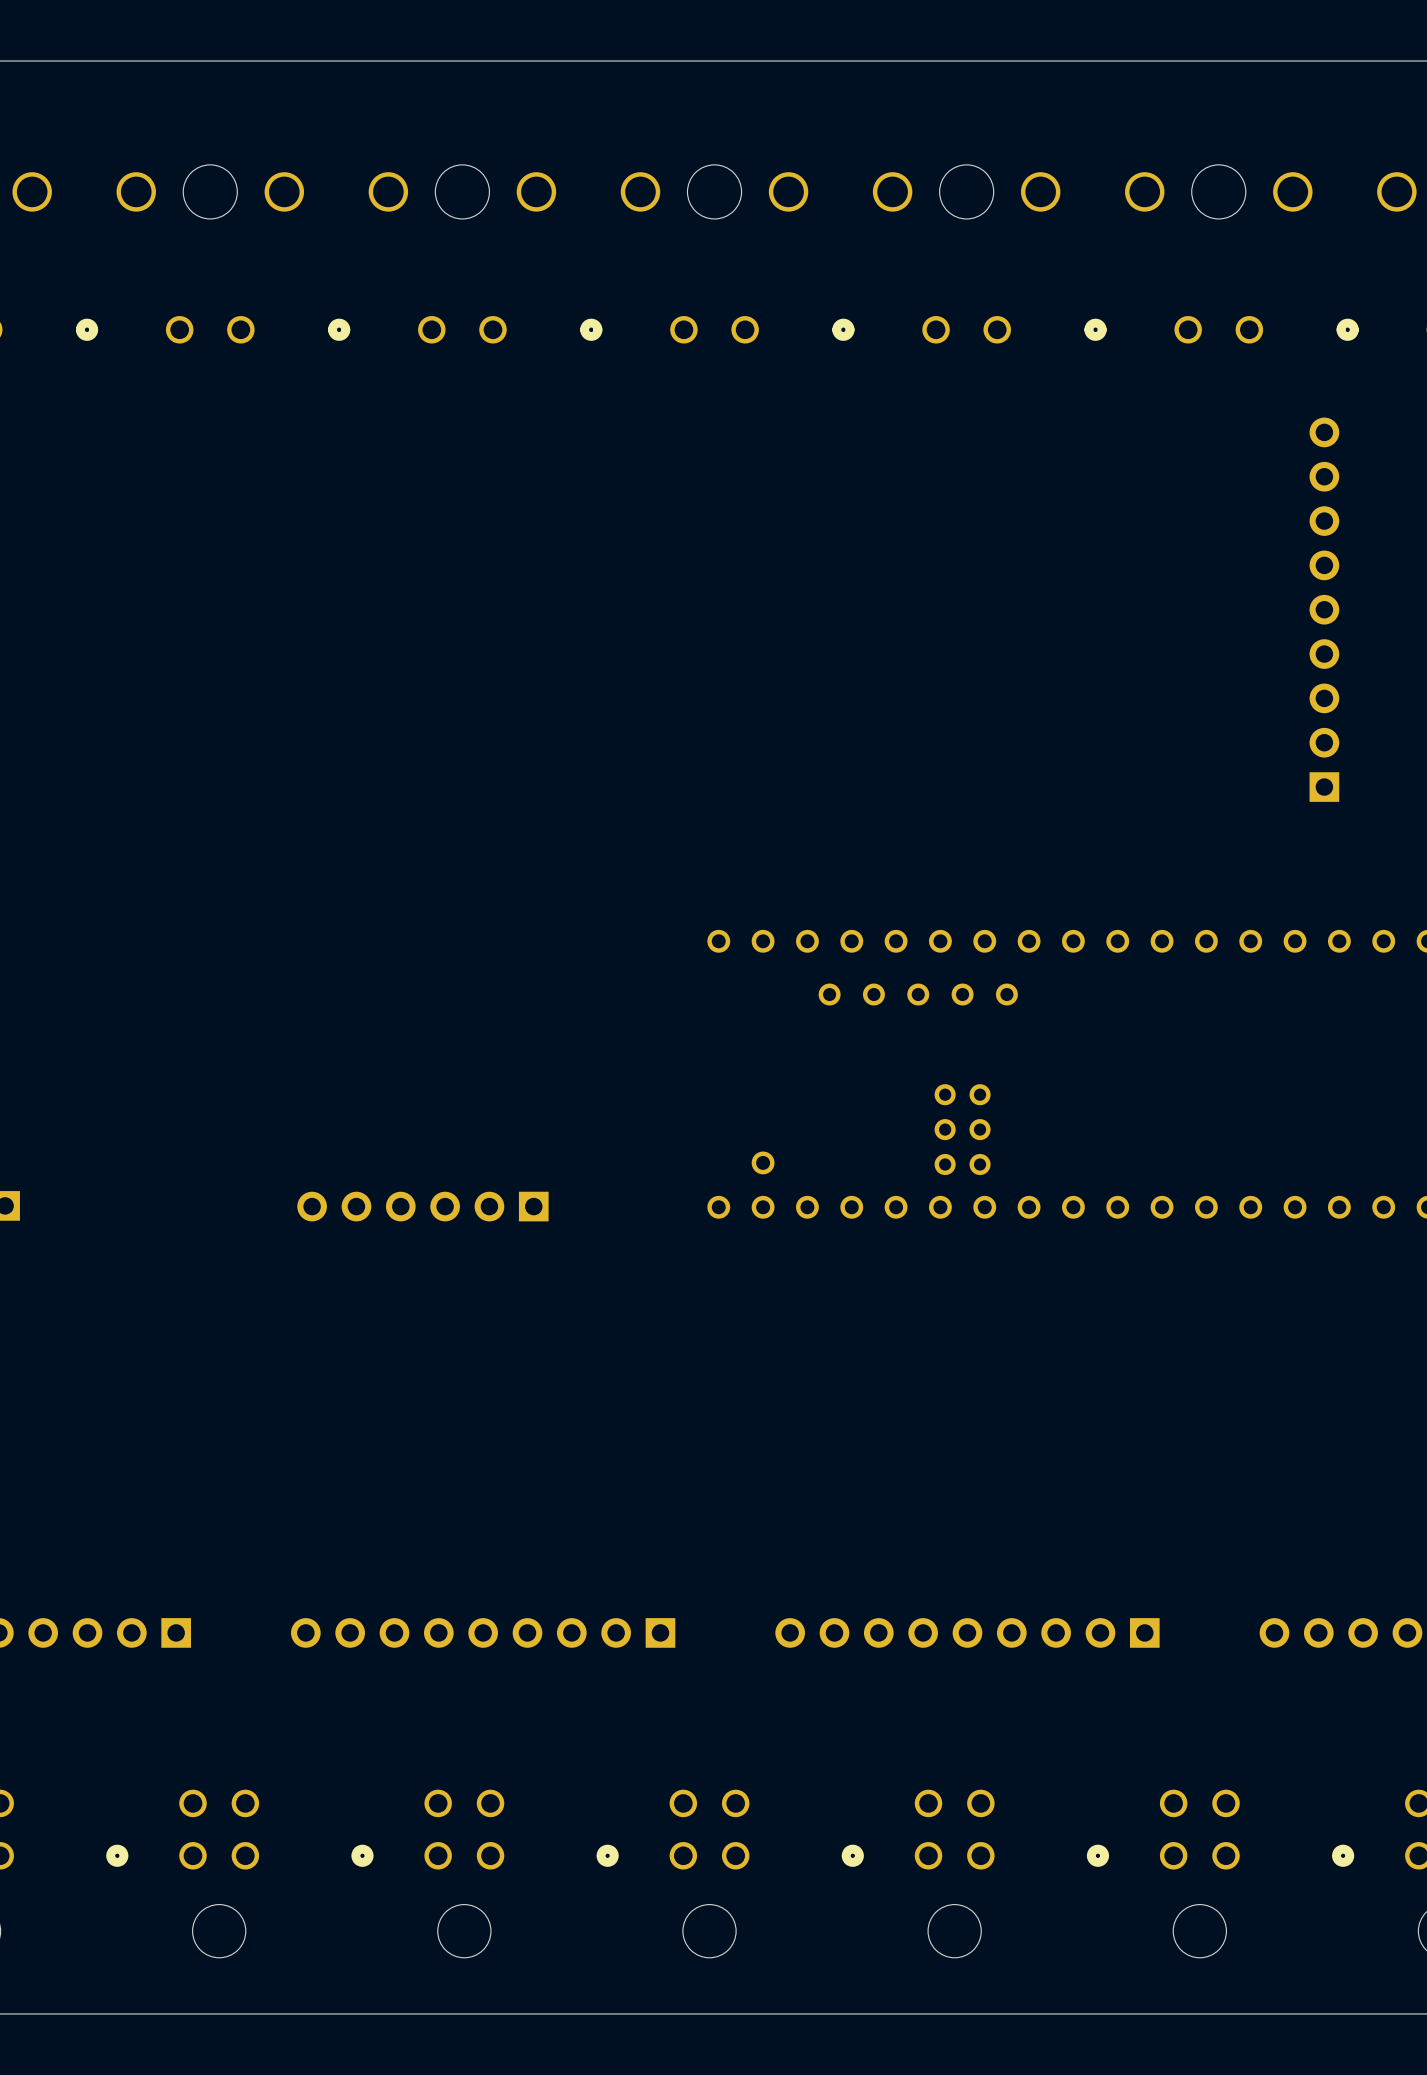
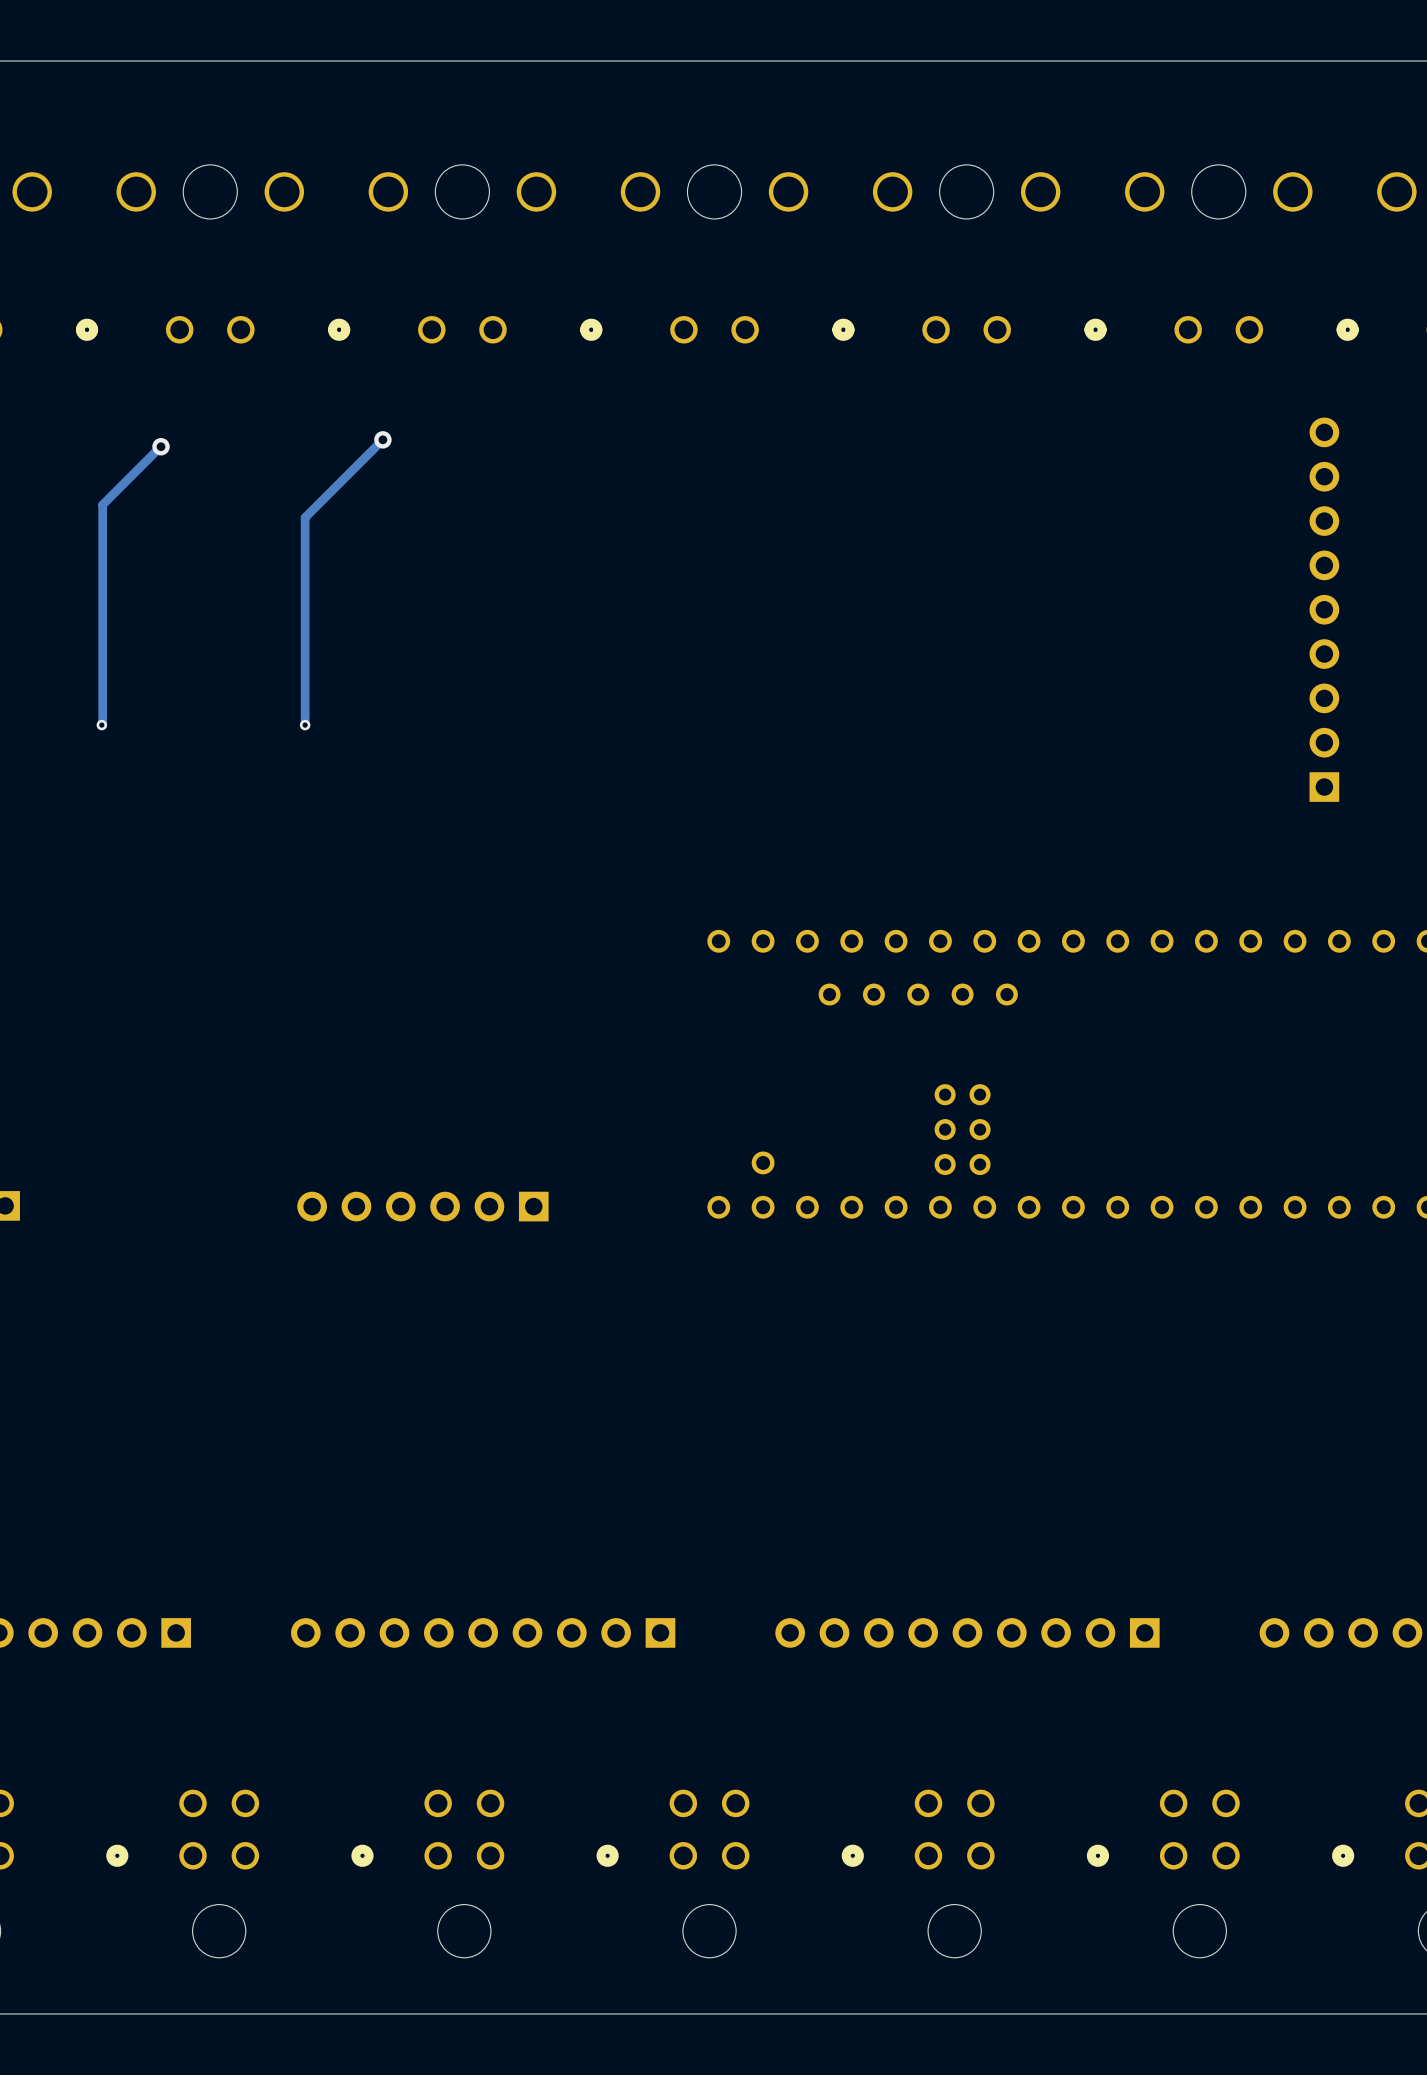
track: none -> (382, 439) (305, 517) (305, 725)
via: none -> (382, 439)
track: none -> (161, 446) (102, 504) (101, 725)
via: none -> (161, 446)
via: none -> (101, 725)
via: none -> (305, 725)

